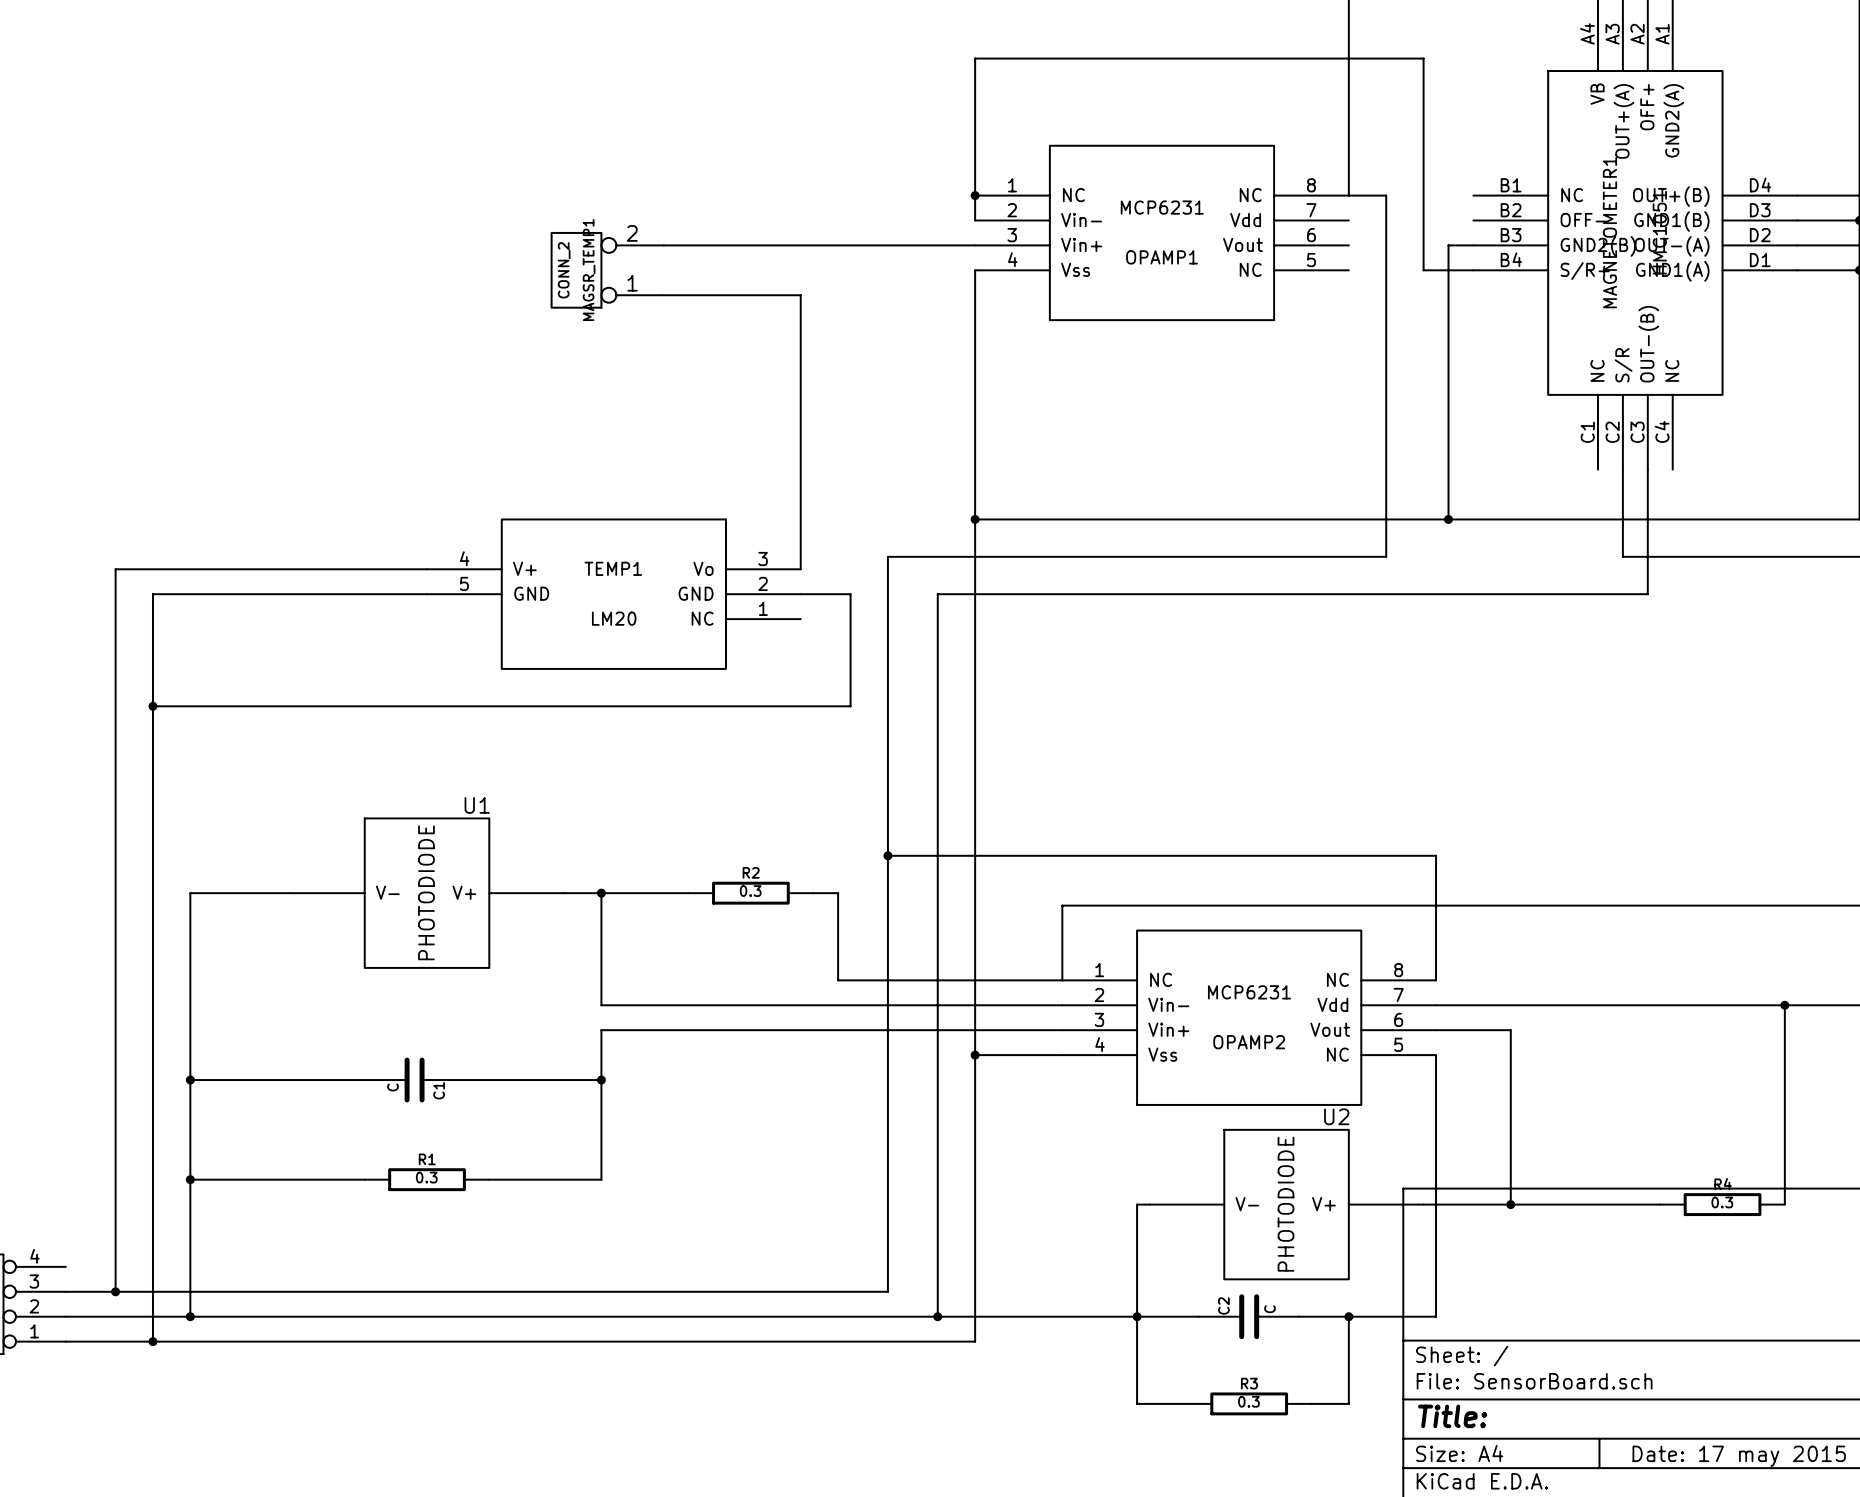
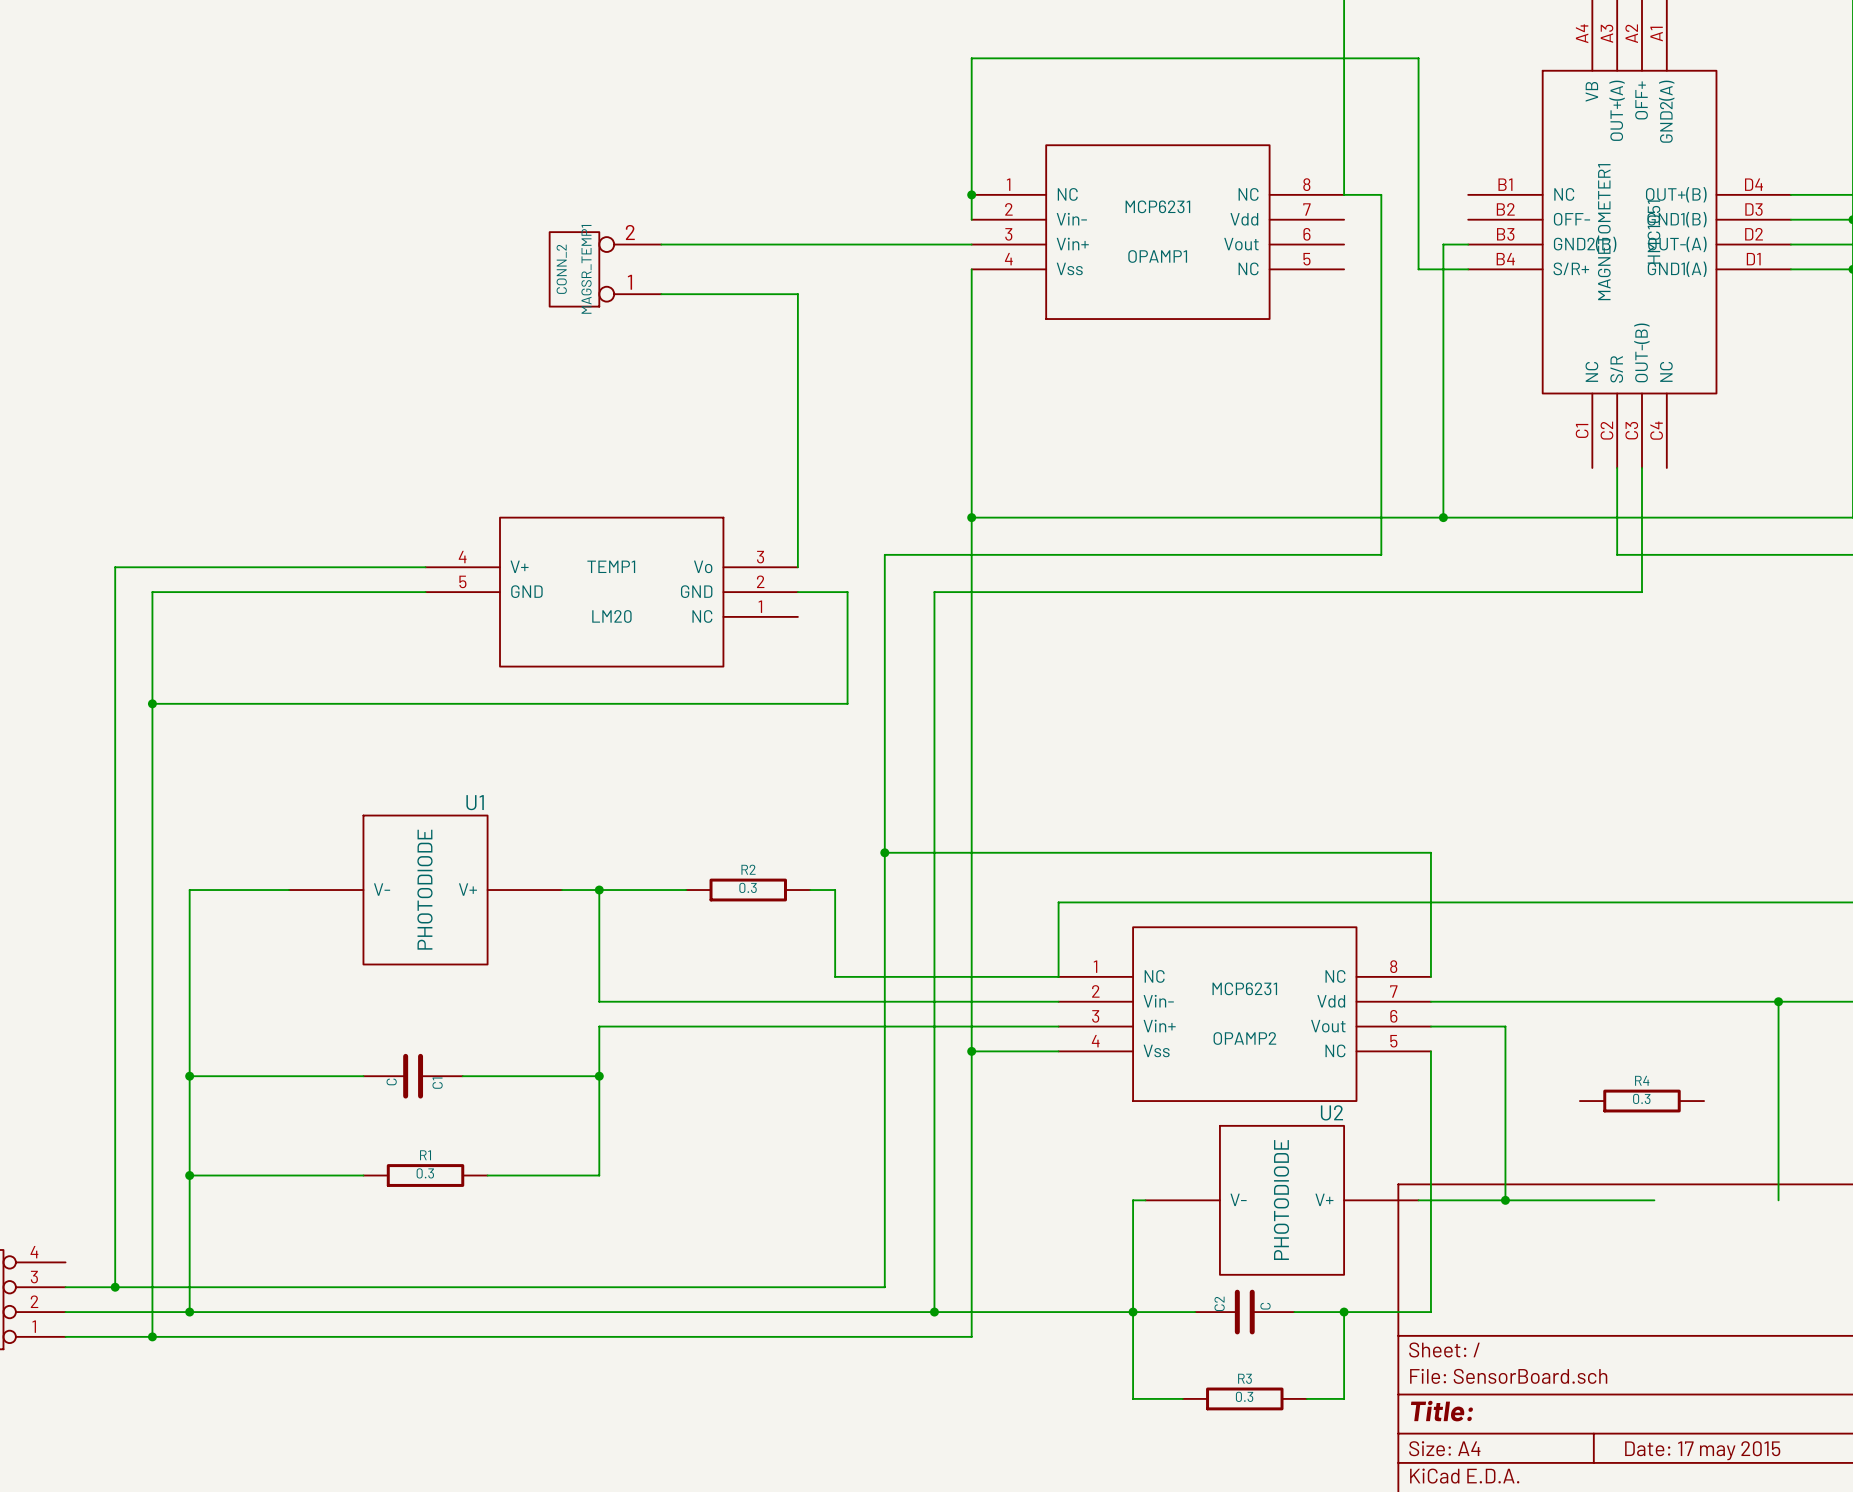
R4 position: (1722, 1204) -> (1641, 1101)

